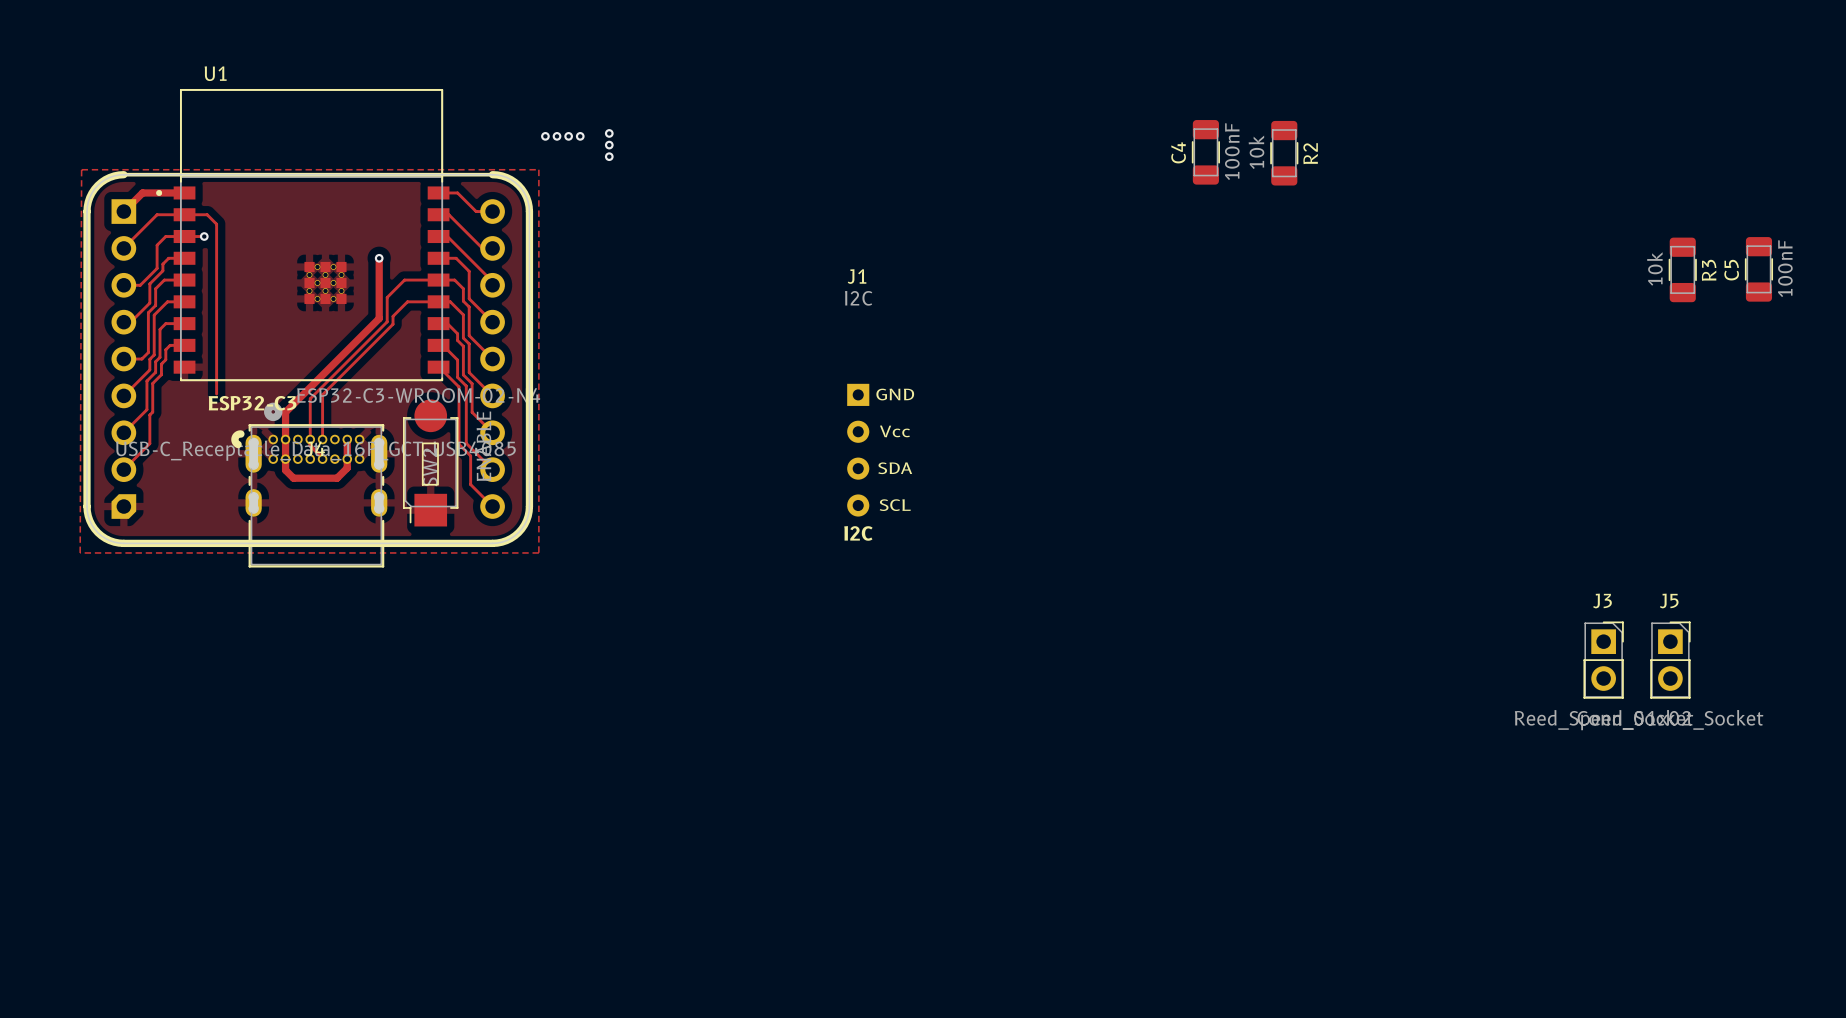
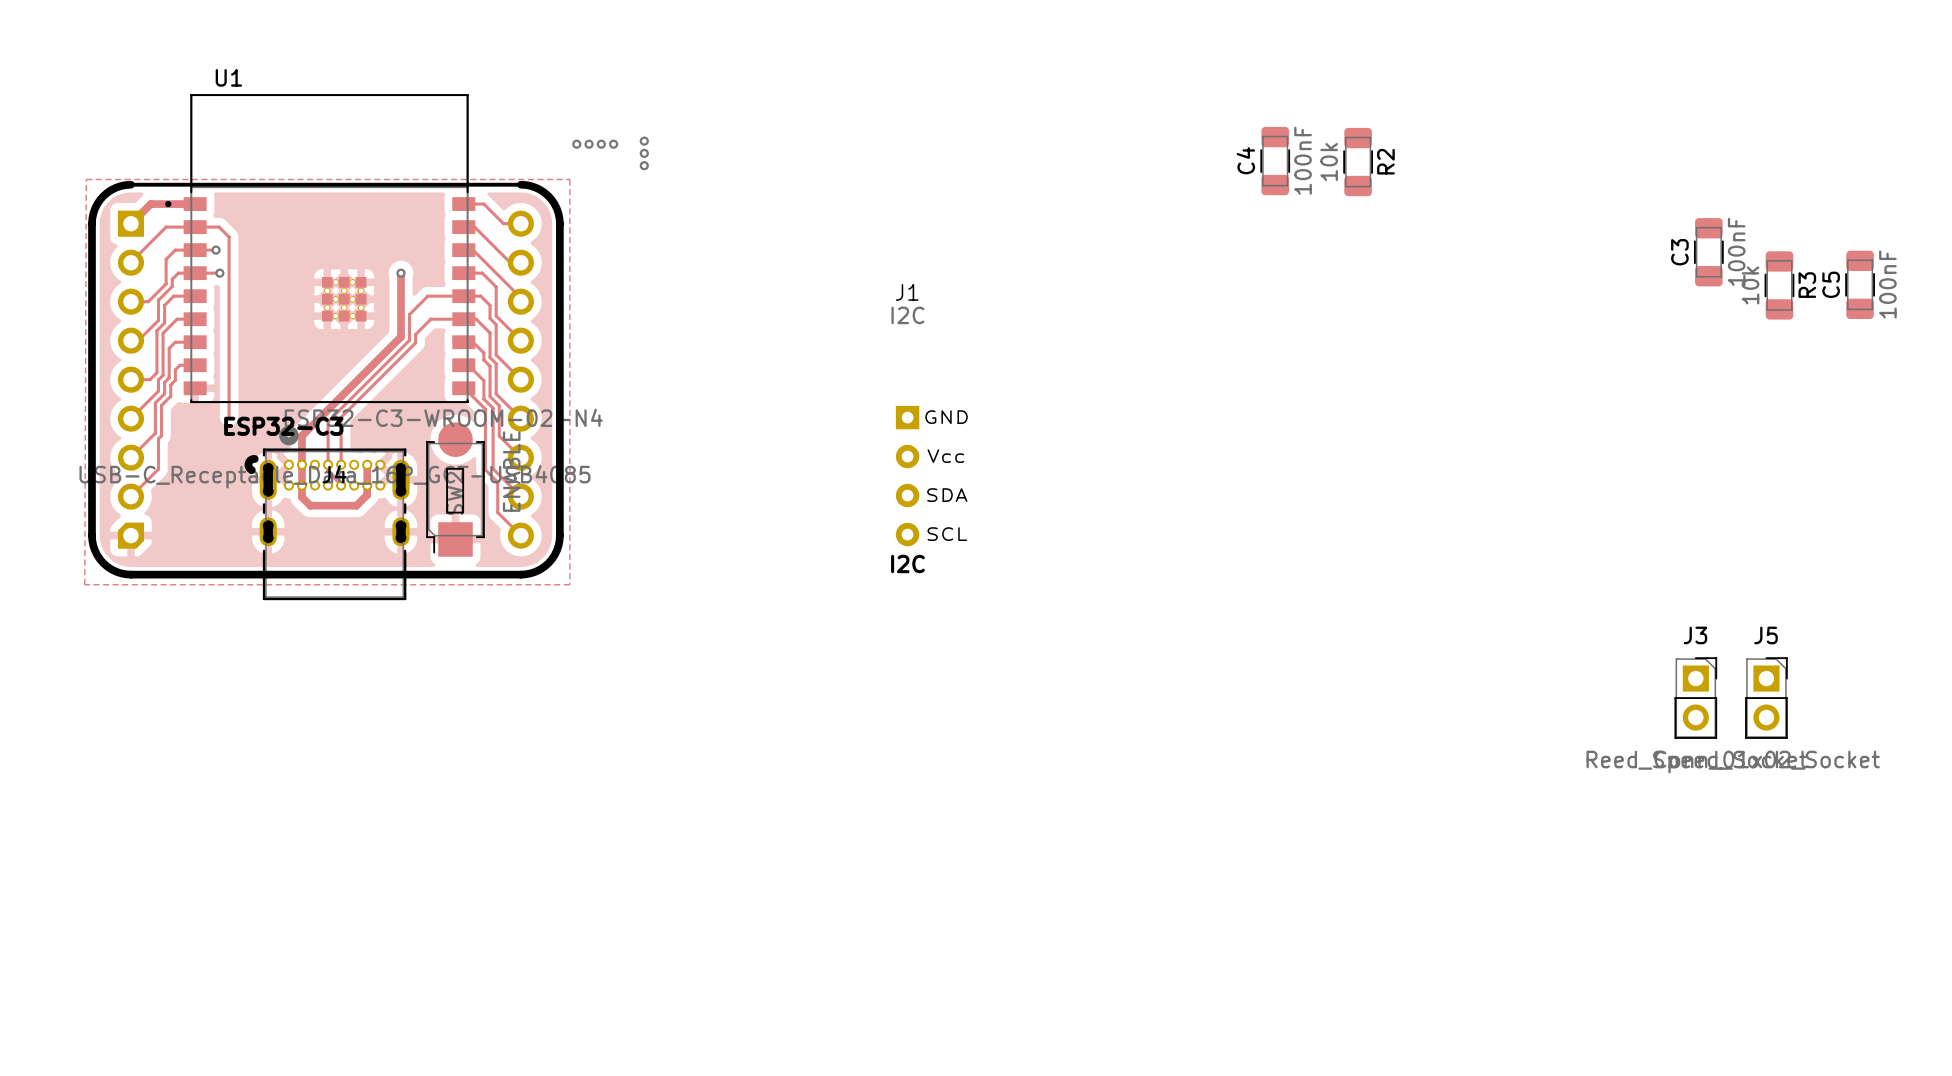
C3: none -> 100nF (1708, 252)
track: none -> (201, 273) (219, 273)
via: none -> (219, 273)

